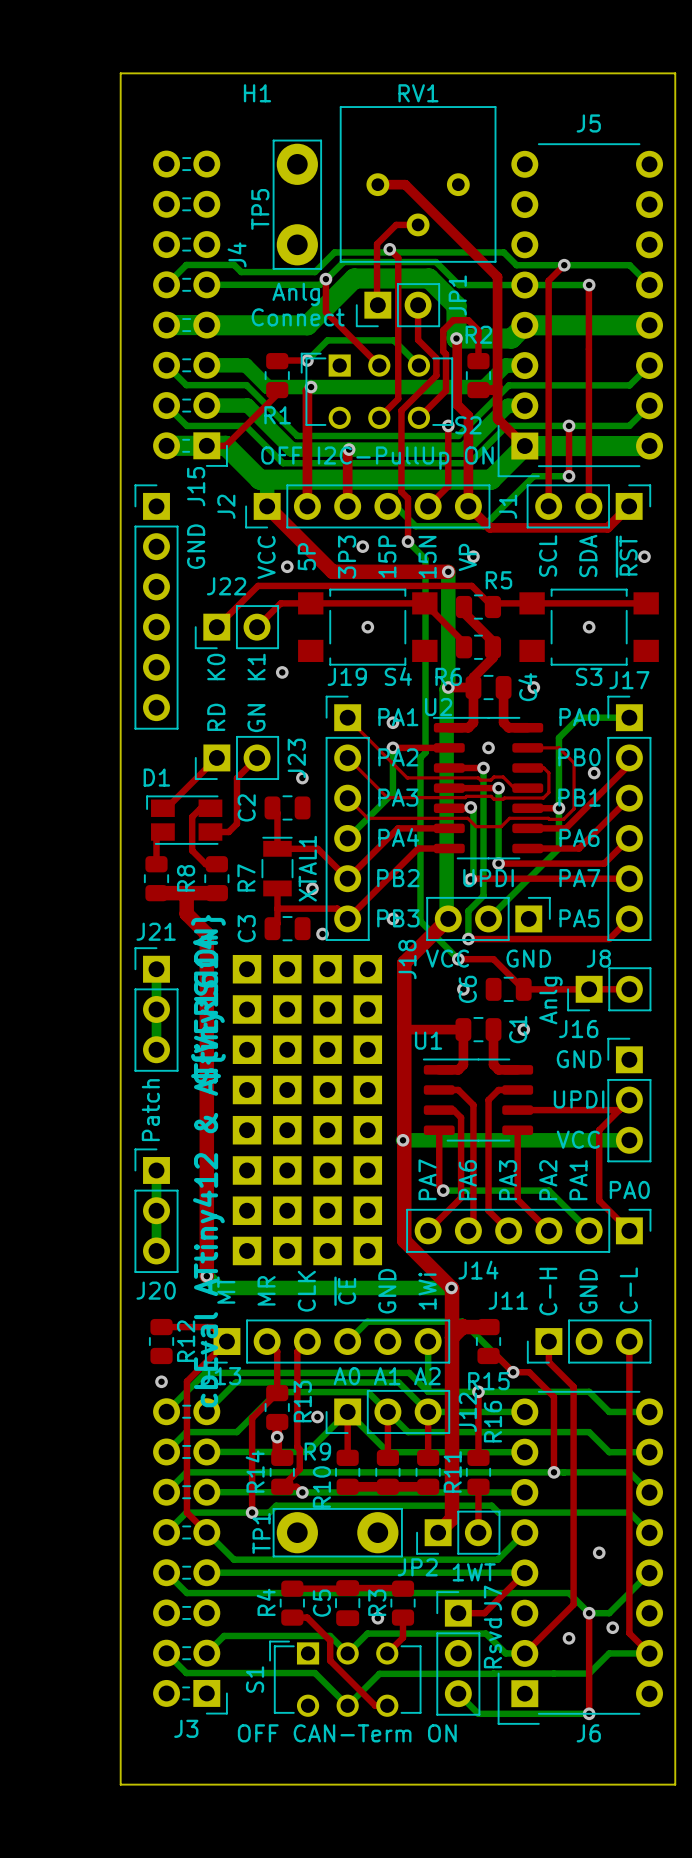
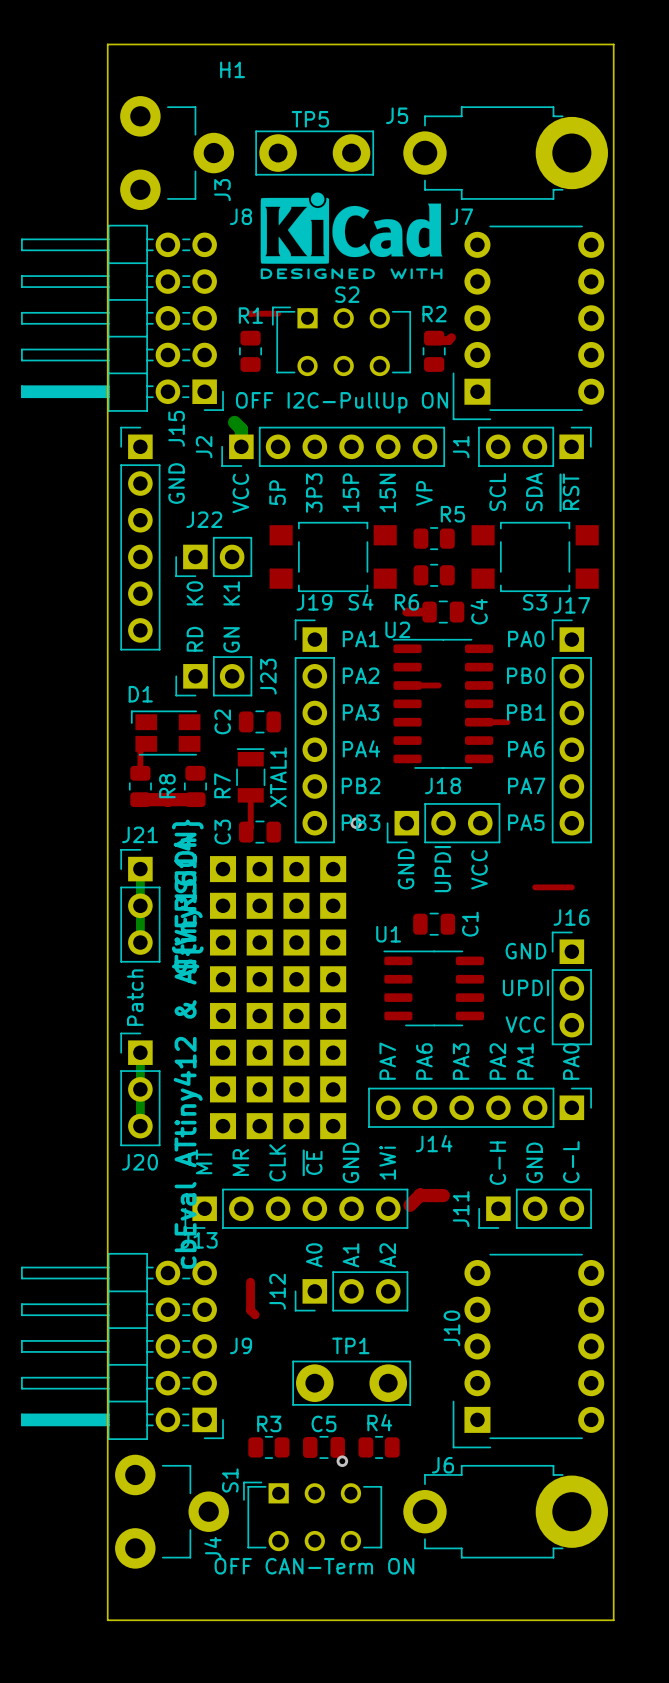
H1 footprint: [119, 72, 677, 1786] -> [106, 43, 615, 1622]
J5 name position: J5 (588, 123) -> J5 (397, 115)
J5 footprint: [497, 143, 663, 478] -> [403, 106, 608, 200]
J4 footprint: [153, 150, 228, 467] -> [115, 1454, 229, 1569]
top track: (377, 184) (405, 184) (497, 276) (497, 418) (524, 446) -> none
RV1: (418, 184) -> none
TP5 rotation: 0° (297, 204) -> 90° clockwise (314, 153)
top track: (418, 224) (396, 224) (377, 244) (377, 305) -> none
drawing: none -> [260, 192, 443, 280]
top track: (389, 249) (398, 257) (398, 398) (379, 417) -> none
via: (389, 249) -> none
J4 name position: J4 (237, 254) -> J4 (212, 1548)
top track: (564, 265) (548, 280) (548, 506) -> none
via: (564, 265) -> none
top track: (325, 279) (325, 312) (379, 365) -> none
via: (325, 279) -> none
bottom track: (166, 284) (186, 264) (234, 264) (241, 272) (314, 272) (334, 252) (503, 252) (516, 265) (629, 265) (649, 285) -> none
bottom track: (206, 284) (320, 284) (343, 262) (435, 262) (458, 285) (589, 285) -> none
top track: (589, 285) (588, 506) -> none
via: (589, 285) -> none
text: Anlg (296, 294) -> none
JP1: (397, 305) -> none
top track: (418, 305) (418, 340) (436, 358) (436, 375) (401, 410) (401, 491) (408, 498) (408, 541) -> none
text: Connect (298, 317) -> none
bottom track: (166, 325) (307, 325) (354, 278) (429, 278) (456, 305) (456, 338) (511, 338) (524, 325) (649, 325) -> none
top track: (456, 338) (457, 404) (468, 415) (468, 506) (489, 527) (607, 527) (629, 506) -> none
via: (456, 338) -> none
bottom track: (307, 360) (327, 340) (393, 340) (418, 365) -> none
via: (307, 360) -> none
top track: (478, 361) (478, 330) (468, 320) (453, 320) (443, 330) (443, 351) (446, 354) (446, 390) (418, 417) -> none
bottom track: (166, 365) (186, 385) (246, 385) (297, 435) (458, 435) (508, 385) (629, 385) (649, 365) -> none
bottom track: (206, 365) (245, 365) (267, 387) (484, 387) (505, 365) (524, 365) -> none
R1 position: (277, 375) -> (250, 351)
R2 position: (478, 375) -> (434, 351)
top track: (311, 387) (307, 390) (307, 506) -> none
via: (311, 387) -> none
top track: (277, 390) (277, 394) (225, 445) (206, 445) -> none
bottom track: (166, 405) (186, 425) (245, 425) (283, 463) (469, 463) (506, 425) (629, 425) (649, 405) -> none
bottom track: (206, 405) (247, 405) (291, 449) (463, 449) (507, 405) (524, 405) -> none
R1 name position: R1 (277, 415) -> R1 (250, 315)
top track: (448, 425) (448, 486) (428, 506) -> none
via: (448, 425) -> none
S2 name position: S2 (468, 425) -> S2 (347, 294)
top track: (569, 425) (569, 476) -> none
via: (569, 425) -> none
bottom track: (166, 445) (225, 445) (259, 479) (491, 479) (524, 446) (649, 446) -> none
top track: (349, 449) (347, 506) -> none
via: (349, 449) -> none
bottom track: (569, 476) (533, 476) (483, 526) (415, 526) (395, 506) (387, 506) -> none
via: (569, 476) -> none
top track: (267, 506) (332, 571) (448, 571) -> none
bottom track: (408, 541) (425, 559) (425, 752) (420, 757) (420, 921) (458, 959) -> none
via: (408, 541) -> none
via: (362, 546) -> none
via: (473, 556) -> none
via: (644, 556) -> none
via: (287, 566) -> none
bottom track: (448, 571) (448, 687) (446, 689) (446, 917) (448, 918) -> none
via: (448, 571) -> none
top track: (646, 603) (496, 603) (492, 607) (471, 585) (258, 585) (216, 627) -> none
top track: (464, 607) (464, 612) (492, 641) (492, 657) (473, 677) (473, 722) (468, 727) (449, 727) -> none
top track: (257, 627) (280, 603) (424, 603) (464, 642) (464, 647) -> none
via: (367, 627) -> none
via: (589, 627) -> none
via: (282, 672) -> none
via: (448, 687) -> none
top track: (503, 687) (503, 722) (508, 727) (527, 727) -> none
via: (533, 687) -> none
top track: (347, 717) (407, 777) (478, 777) (480, 780) (490, 780) (493, 777) (503, 777) (514, 788) (527, 788) -> none
bottom track: (629, 717) (579, 717) (558, 737) (558, 848) (488, 918) -> none
via: (392, 722) -> none
top track: (392, 747) (449, 747) -> none
bottom track: (392, 747) (392, 793) (347, 838) -> none
via: (392, 747) -> none
via: (488, 747) -> none
top track: (527, 747) (558, 747) (574, 762) (574, 808) (563, 819) (509, 818) (501, 826) (476, 826) (467, 818) (367, 818) (347, 798) -> none
top track: (216, 757) (166, 808) (162, 808) -> none
top track: (257, 757) (236, 778) (236, 823) (228, 832) (210, 832) -> none
top track: (347, 757) (387, 797) (491, 796) (493, 799) (543, 798) (548, 792) (548, 773) (543, 768) (527, 768) -> none
top track: (629, 757) (629, 764) (565, 828) (527, 828) -> none
bottom track: (483, 768) (483, 895) (468, 910) (468, 939) -> none
via: (483, 768) -> none
via: (594, 773) -> none
via: (302, 778) -> none
top track: (449, 788) (498, 788) -> none
bottom track: (498, 788) (498, 863) -> none
via: (498, 788) -> none
top track: (629, 798) (579, 848) (527, 848) -> none
top track: (272, 807) (277, 812) (277, 848) (317, 848) (347, 878) (397, 828) (449, 828) -> none
bottom track: (470, 807) (473, 810) (473, 876) (470, 879) -> none
via: (470, 807) -> none
top track: (210, 808) (200, 808) (192, 816) (192, 850) (205, 864) (216, 864) -> none
via: (558, 808) -> none
top track: (629, 838) (604, 863) (498, 863) -> none
top track: (449, 848) (418, 848) (347, 918) (337, 908) (277, 908) -> none
via: (498, 863) -> none
text rotation: 0° (488, 878) -> 90° counterclockwise (442, 869)
text position: UPDI (488, 878) -> UPDI (442, 869)
top track: (629, 878) (470, 879) -> none
via: (470, 879) -> none
via: (312, 888) -> none
top track: (186, 893) (186, 913) (206, 934) (206, 1276) -> none
top track: (448, 918) (404, 962) (404, 1240) (452, 1288) (452, 1518) (438, 1532) -> none
J18 rotation: 0° (488, 918) -> 180° (443, 823)
top track: (629, 918) (609, 939) (468, 939) -> none
via: (322, 934) -> none
via: (468, 939) -> none
text rotation: 0° (447, 958) -> 90° counterclockwise (479, 869)
text position: VCC (447, 958) -> VCC (479, 869)
text rotation: 0° (528, 958) -> 90° counterclockwise (406, 869)
text position: GND (528, 958) -> GND (406, 869)
J8 name position: J8 (598, 958) -> J8 (241, 216)
J18 name position: J18 (407, 959) -> J18 (442, 785)
top track: (458, 959) (493, 959) (523, 989) (589, 989) -> none
via: (458, 959) -> none
J8 footprint: [567, 967, 652, 1012] -> [21, 224, 224, 412]
via: (463, 989) -> none
C6: (508, 989) -> none
text: Anlg (550, 1000) -> none
top track: (404, 1028) (463, 1029) (463, 1064) (458, 1069) (439, 1069) -> none
top track: (493, 1029) (493, 1064) (498, 1069) (517, 1069) -> none
via: (523, 1029) -> none
J16 name position: J16 (578, 1029) -> J16 (571, 917)
top track: (439, 1089) (458, 1089) (473, 1105) (473, 1225) (468, 1230) -> none
top track: (517, 1089) (498, 1089) (488, 1100) (488, 1210) (508, 1230) -> none
top track: (629, 1100) (599, 1130) (599, 1200) (629, 1230) -> none
top track: (439, 1110) (453, 1110) (461, 1117) (461, 1197) (428, 1230) -> none
top track: (517, 1110) (619, 1110) -> none
top track: (439, 1130) (439, 1186) (443, 1190) -> none
top track: (517, 1130) (517, 1199) (548, 1230) -> none
bottom track: (403, 1140) (629, 1140) -> none
via: (403, 1140) -> none
bottom track: (443, 1190) (548, 1190) (589, 1230) -> none
via: (443, 1190) -> none
text rotation: 0° (629, 1190) -> 90° counterclockwise (571, 1061)
bottom track: (206, 1276) (218, 1287) (451, 1287) -> none
via: (206, 1276) -> none
via: (451, 1287) -> none
J11 name rotation: 0° (508, 1300) -> 90° counterclockwise (461, 1209)
top track: (161, 1327) (212, 1327) (226, 1341) (186, 1381) (186, 1512) (206, 1532) -> none
R12: (161, 1341) -> none
top track: (267, 1341) (277, 1351) (277, 1393) (252, 1418) (252, 1512) -> none
top track: (307, 1341) (297, 1351) (297, 1447) (299, 1449) (299, 1469) (282, 1486) (296, 1486) (302, 1492) -> none
bottom track: (347, 1341) (367, 1321) (462, 1321) (513, 1372) -> none
bottom track: (428, 1341) (428, 1391) -> none
R15: (488, 1341) -> none
top track: (548, 1341) (548, 1362) (573, 1386) (573, 1604) (524, 1653) -> none
top track: (629, 1341) (629, 1633) (649, 1653) -> none
top track: (488, 1355) (496, 1355) (513, 1372) (529, 1372) (553, 1396) (553, 1472) -> none
via: (513, 1372) -> none
text rotation: 0° (346, 1376) -> 90° counterclockwise (314, 1255)
text rotation: 0° (387, 1376) -> 90° counterclockwise (350, 1255)
text rotation: 0° (427, 1376) -> 90° counterclockwise (387, 1255)
via: (161, 1381) -> none
J6 footprint: [497, 1390, 663, 1725] -> [403, 1464, 608, 1559]
bottom track: (428, 1391) (589, 1391) (609, 1411) (649, 1411) -> none
bottom track: (428, 1391) (409, 1372) (205, 1372) (166, 1411) -> none
top track: (478, 1391) (478, 1457) -> none
via: (478, 1391) -> none
J3 footprint: [153, 1398, 228, 1715] -> [120, 96, 235, 211]
R13: (277, 1407) -> none
bottom track: (206, 1411) (236, 1382) (398, 1382) (428, 1411) (524, 1411) -> none
top track: (347, 1411) (347, 1457) -> none
top track: (387, 1411) (387, 1457) -> none
J12 position: (387, 1411) -> (351, 1291)
top track: (428, 1411) (428, 1457) -> none
J12 name position: J12 (467, 1412) -> J12 (277, 1291)
via: (317, 1416) -> none
via: (277, 1437) -> none
bottom track: (166, 1451) (186, 1432) (236, 1432) (276, 1392) (368, 1392) (408, 1432) (589, 1432) (609, 1452) (649, 1452) -> none
bottom track: (206, 1451) (307, 1451) (347, 1411) (387, 1452) (524, 1452) -> none
R14: (282, 1472) -> none
R9: (347, 1472) -> none
R10: (387, 1472) -> none
R11: (428, 1472) -> none
R16: (478, 1472) -> none
via: (553, 1472) -> none
top track: (347, 1486) (428, 1486) -> none
top track: (478, 1486) (478, 1532) -> none
J9: none -> (122, 1346)
bottom track: (166, 1492) (186, 1472) (629, 1472) (649, 1492) -> none
bottom track: (206, 1492) (524, 1492) -> none
via: (302, 1492) -> none
J10: none -> (528, 1351)
via: (252, 1512) -> none
bottom track: (166, 1532) (186, 1512) (269, 1512) (276, 1505) (491, 1505) (498, 1512) (629, 1512) (649, 1532) -> none
bottom track: (206, 1532) (234, 1559) (497, 1559) (524, 1532) -> none
TP1 position: (337, 1532) -> (351, 1383)
JP2: (458, 1532) -> none
TP1 name rotation: 0° (261, 1533) -> 90° clockwise (350, 1345)
TP1 name position: TP1 (261, 1533) -> TP1 (350, 1345)
via: (599, 1552) -> none
bottom track: (166, 1572) (186, 1593) (569, 1593) (589, 1613) (609, 1613) (649, 1572) -> none
bottom track: (206, 1572) (524, 1572) -> none
text: 1WT (474, 1572) -> none
top track: (524, 1572) (484, 1613) (458, 1613) -> none
top track: (292, 1588) (403, 1588) -> none
J7 footprint: [436, 1591, 481, 1716] -> [452, 225, 605, 421]
J7 name position: J7 (492, 1598) -> J7 (461, 216)
R4 rotation: 0° (292, 1603) -> 90° clockwise (379, 1447)
R4 position: (292, 1603) -> (379, 1447)
C5 rotation: 0° (347, 1603) -> 90° clockwise (323, 1447)
R3 rotation: 0° (403, 1603) -> 90° clockwise (268, 1447)
R3 position: (403, 1603) -> (268, 1447)
top track: (589, 1613) (589, 1713) -> none
via: (589, 1613) -> none
top track: (292, 1617) (307, 1617) (330, 1640) (330, 1660) (375, 1705) (387, 1705) -> none
top track: (403, 1617) (403, 1637) (387, 1653) -> none
via: (612, 1627) -> none
via: (569, 1638) -> none
text: Rsvd (492, 1643) -> none
bottom track: (166, 1653) (186, 1673) (314, 1673) (347, 1705) (379, 1673) (589, 1673) (609, 1653) (649, 1653) -> none
bottom track: (206, 1653) (224, 1635) (330, 1635) (347, 1653) (367, 1633) (485, 1633) (505, 1653) (524, 1653) -> none
S1 name position: S1 (255, 1679) -> S1 (230, 1480)
bottom track: (458, 1693) (478, 1713) (589, 1713) -> none
via: (589, 1713) -> none
J3 name position: J3 (186, 1728) -> J3 (222, 190)
J6 name position: J6 (588, 1733) -> J6 (442, 1465)

